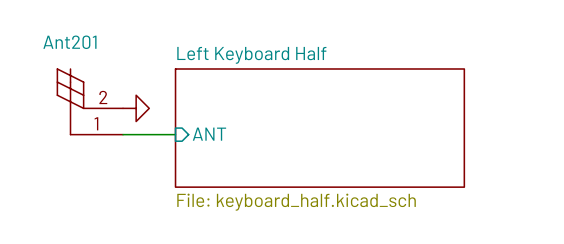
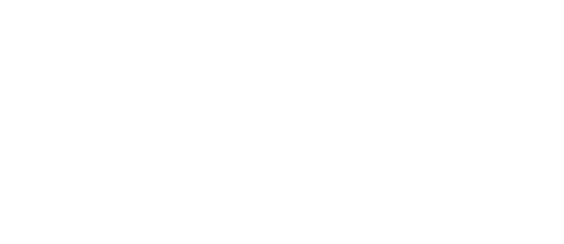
Ant201: (90, 101) -> none
power symbol: (136, 108) -> none
sheet Left Keyboard Half: File: keyboard_half.kicad_sch (319, 128) -> none
wire: (123, 134) (175, 134) -> none
sheet pin: ANT (209, 134) -> none

